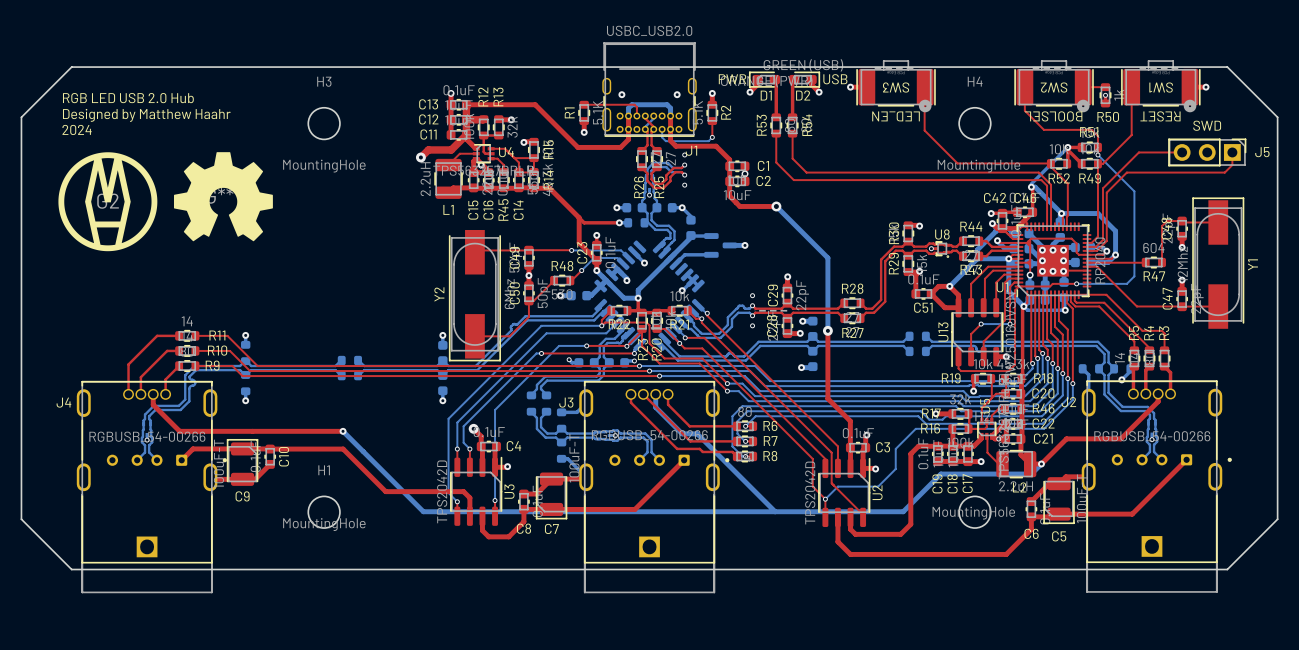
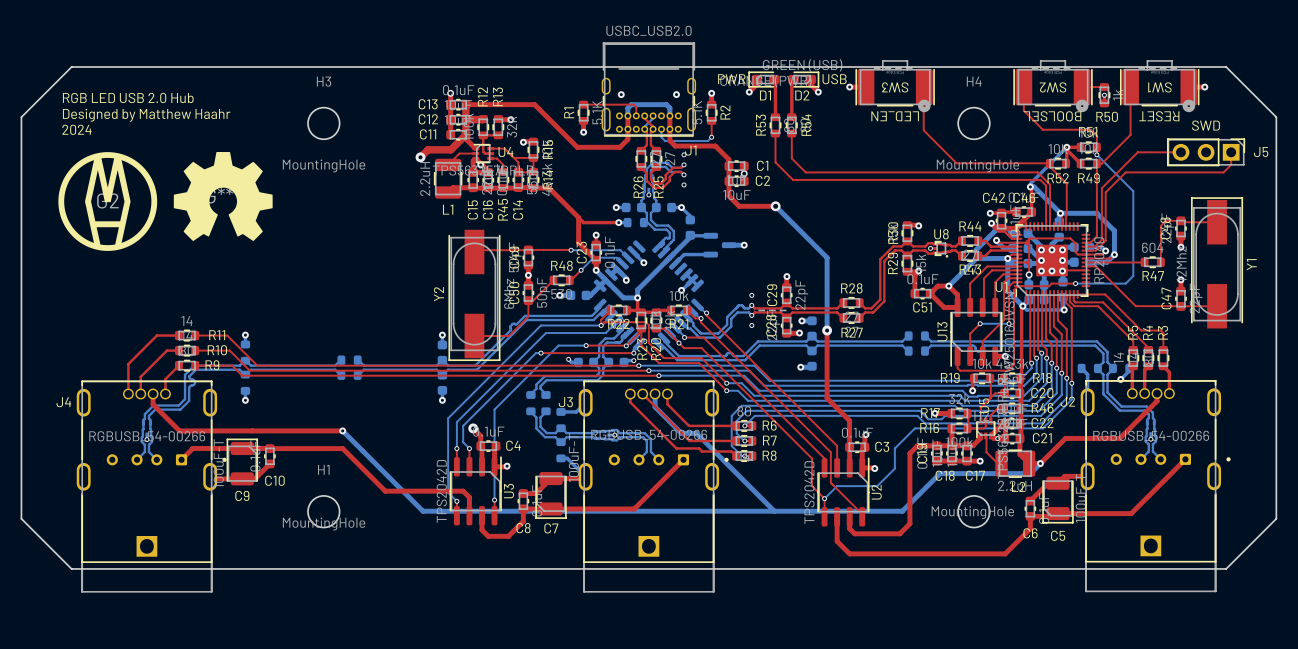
C10 name rotation: 0° (283, 456) -> 90° clockwise (274, 480)
C19 name position: C19 (937, 483) -> C19 (922, 453)
C18 name rotation: 0° (952, 483) -> 90° clockwise (945, 475)
C17 name rotation: 0° (967, 483) -> 90° clockwise (975, 475)

